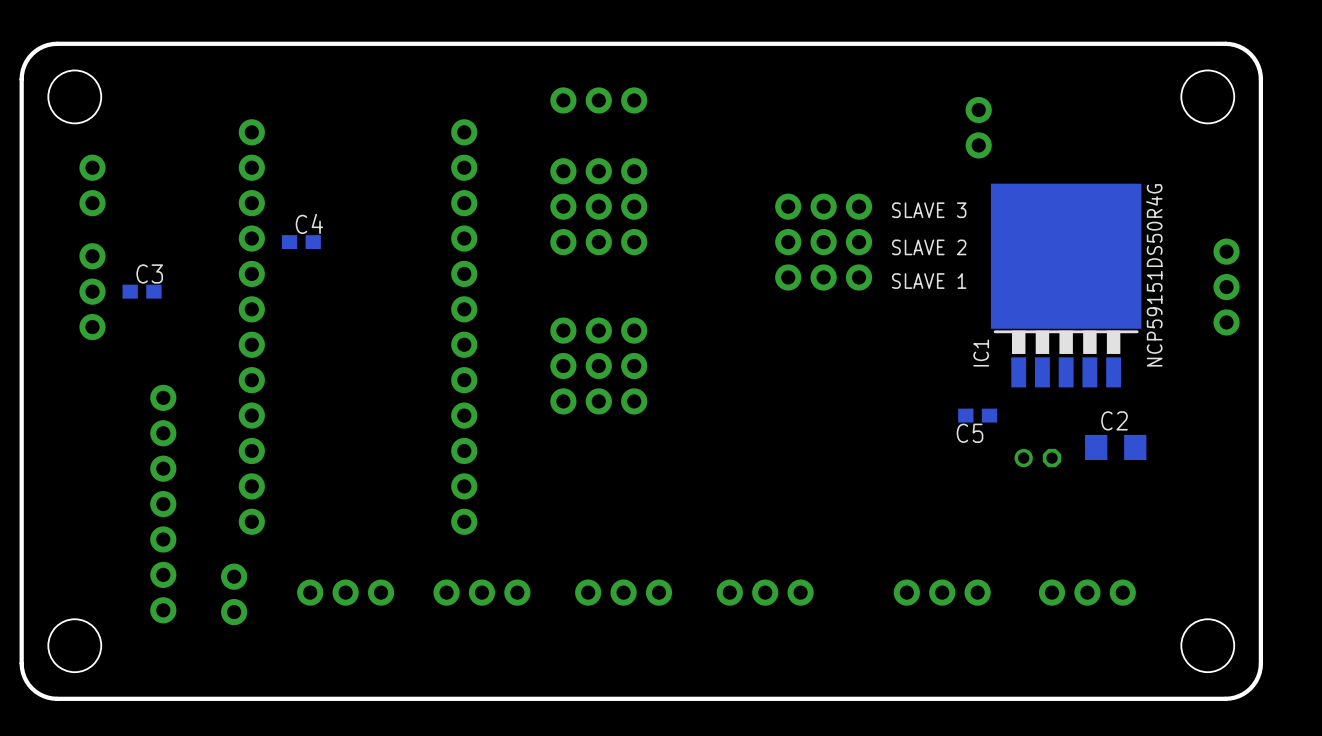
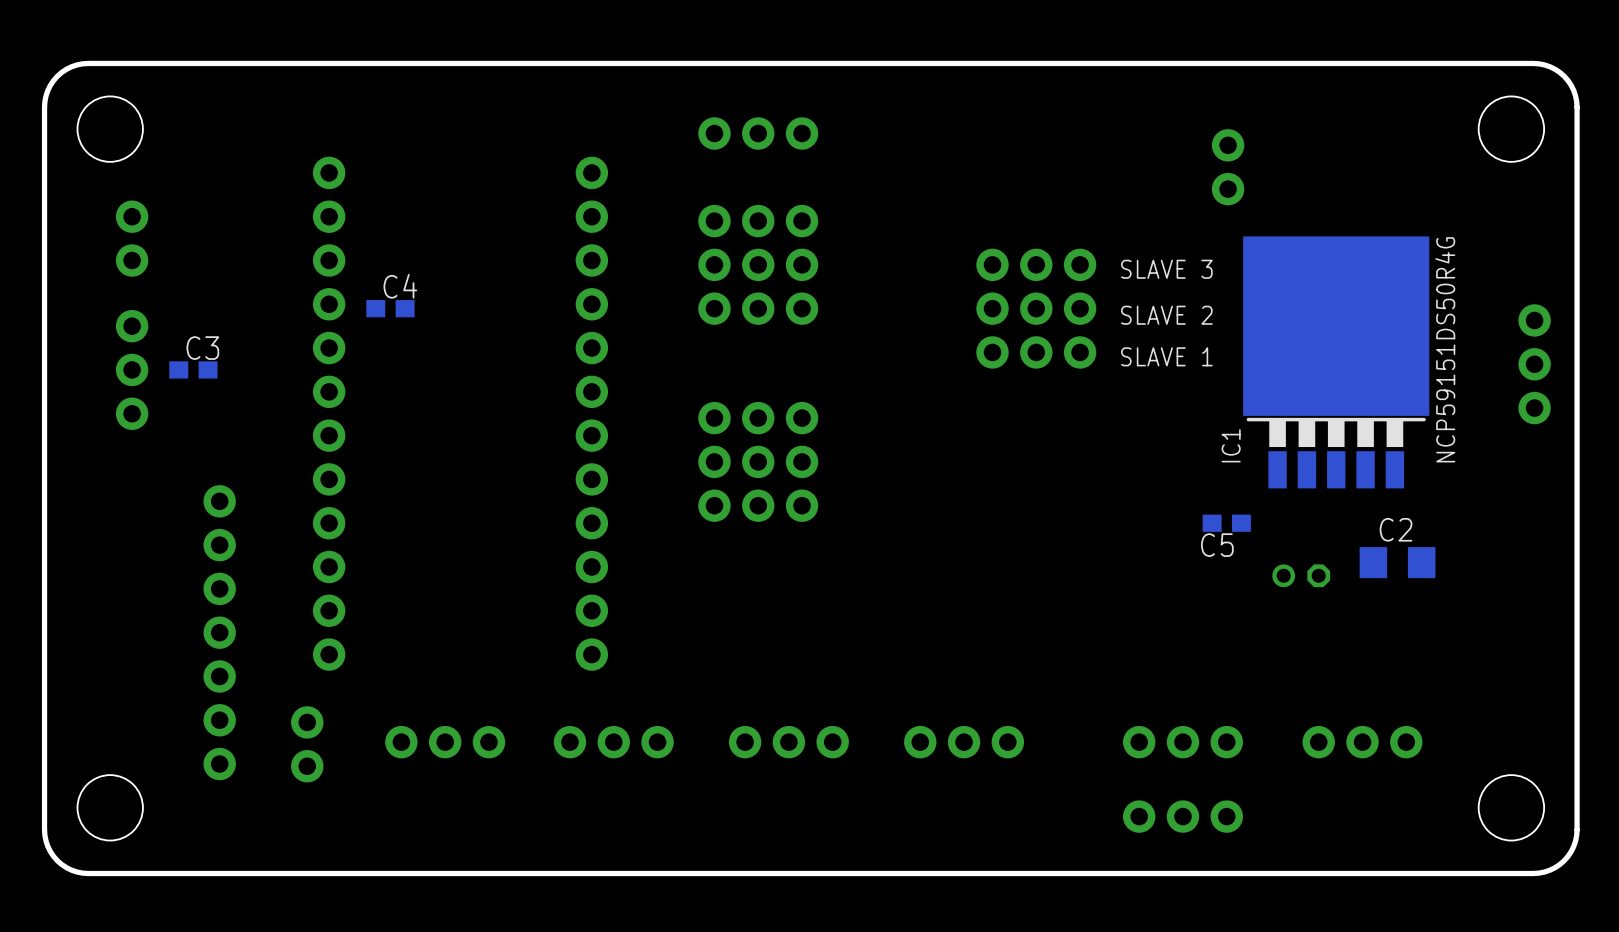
part: none -> (1182, 816)

